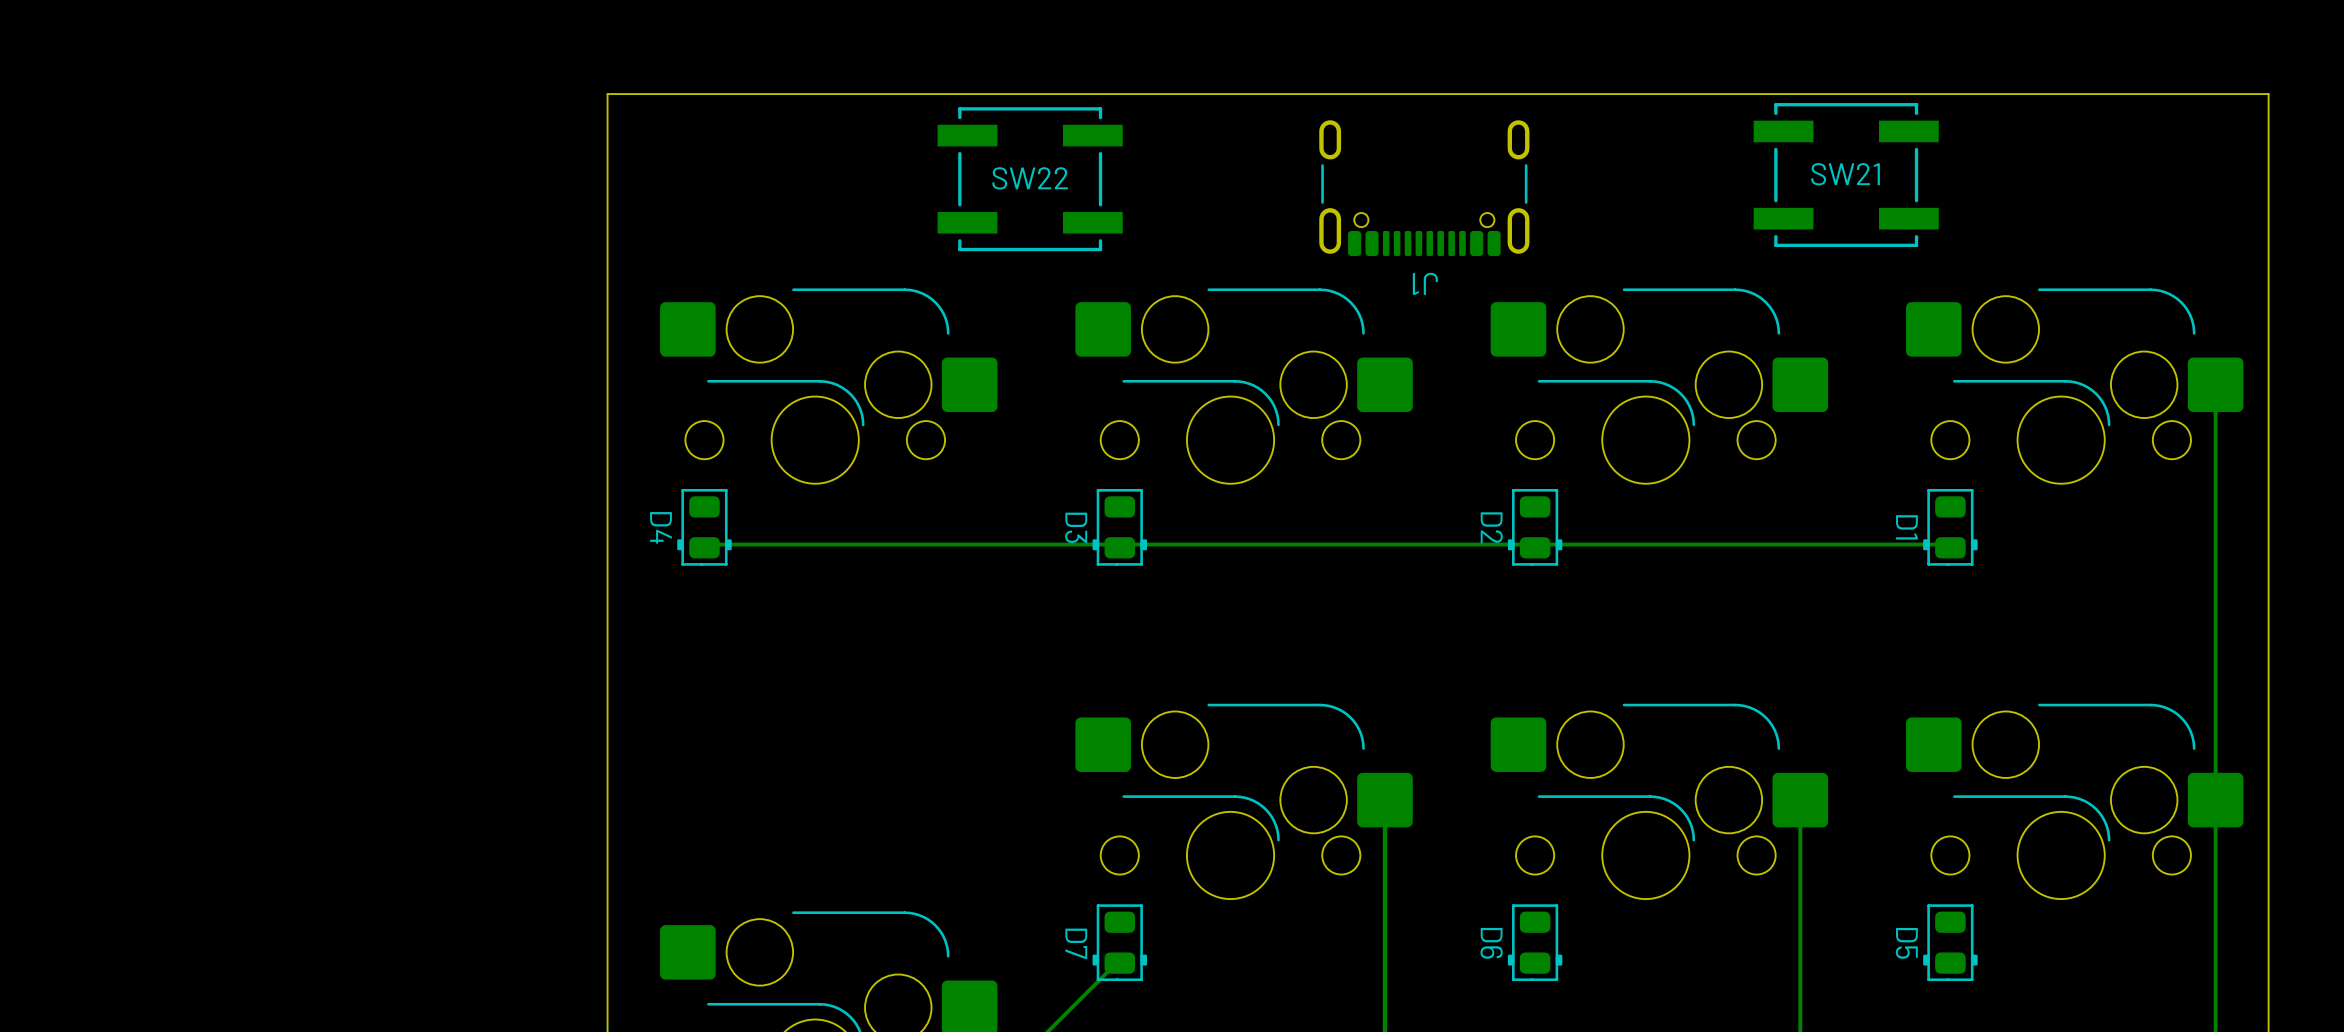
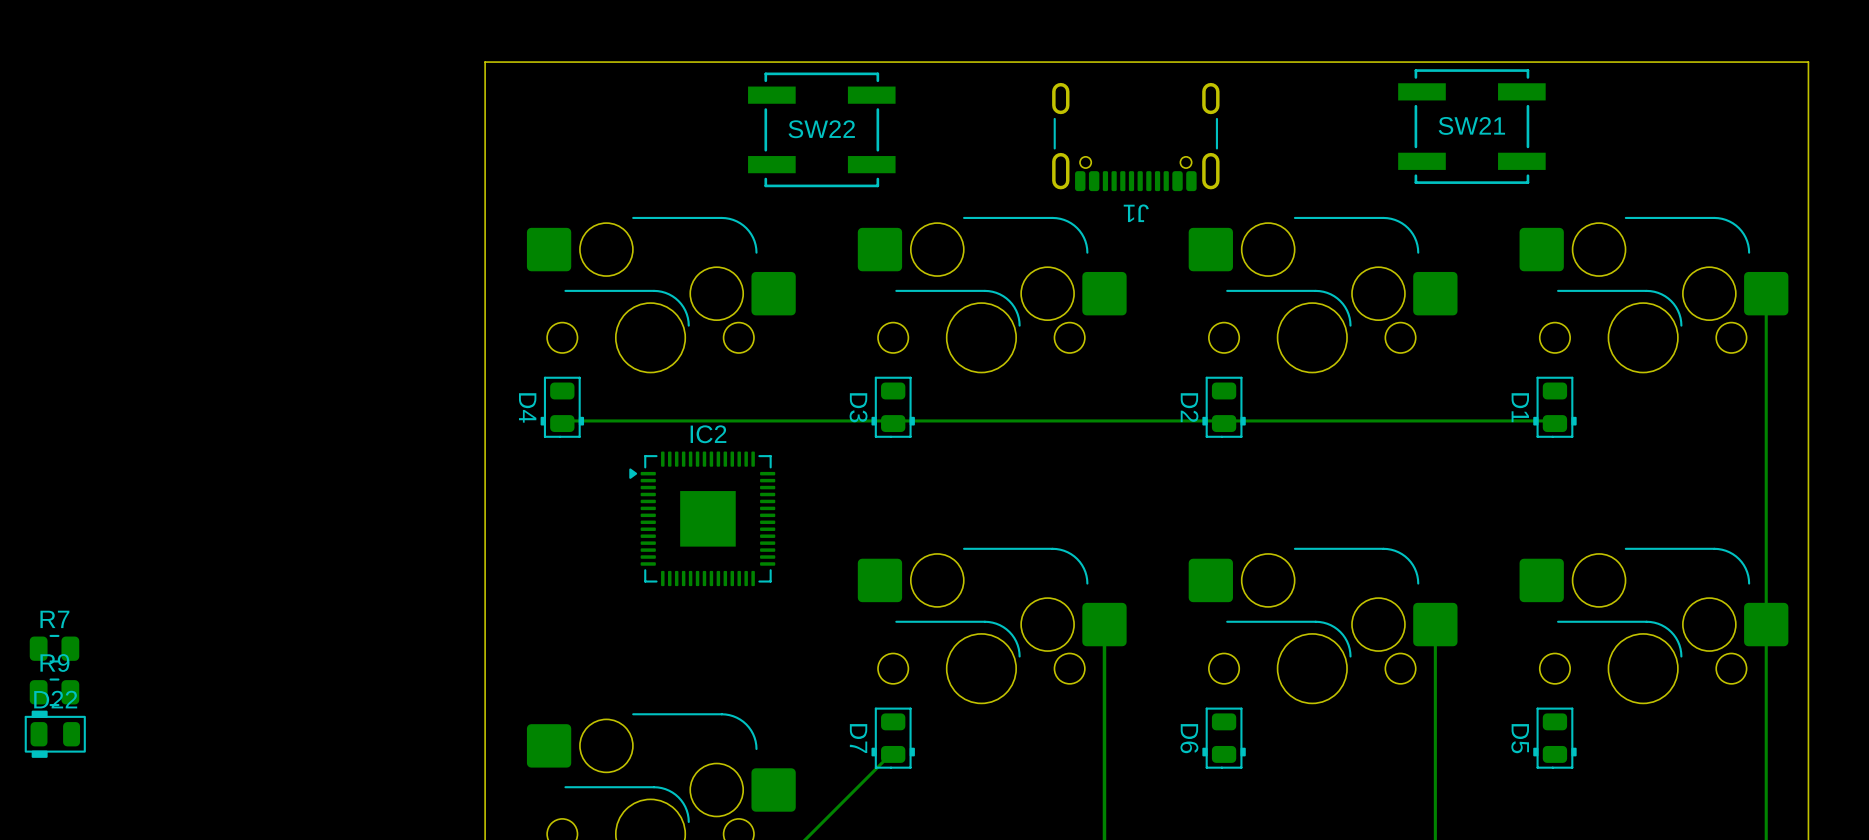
IC2: none -> (702, 518)
R7: none -> (54, 648)
R9: none -> (54, 692)
D22: none -> (55, 734)

